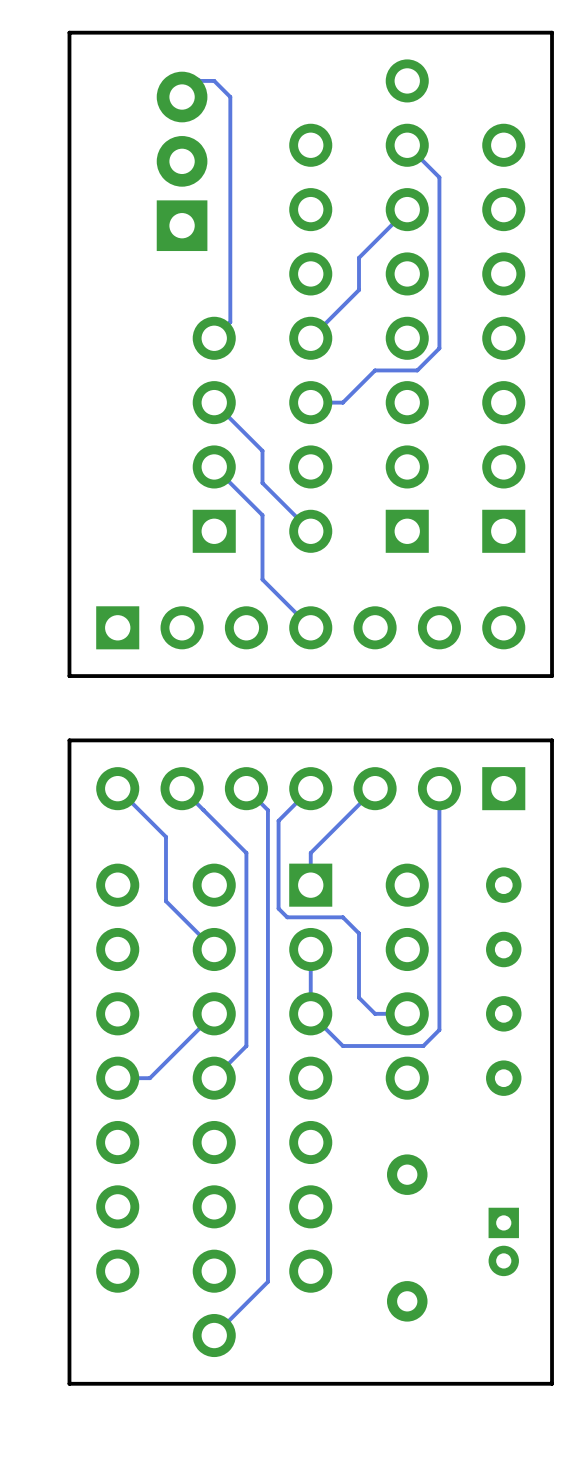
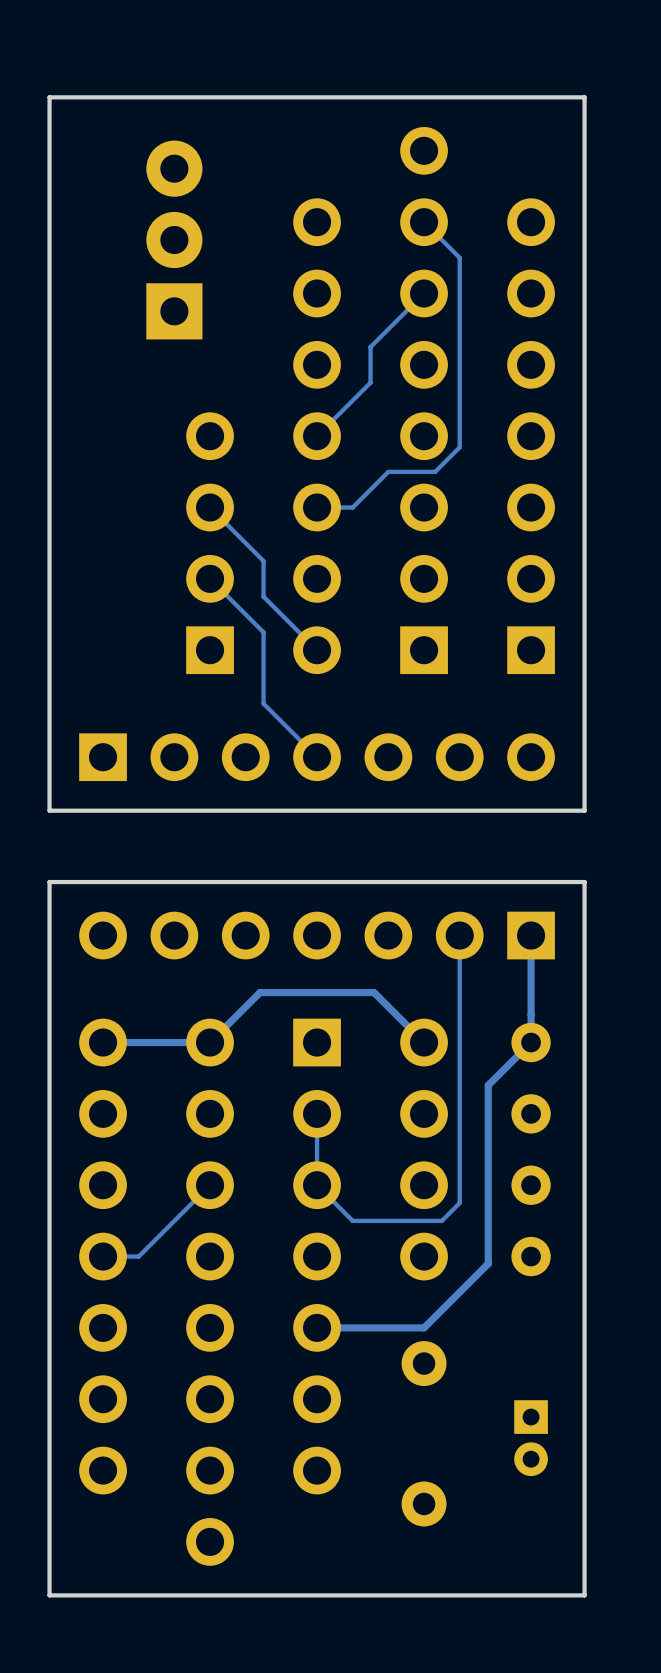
track: (198, 80) (182, 80) (214, 80) (230, 97) (230, 322) (214, 338) -> none
track: (117, 788) (165, 836) (165, 901) (214, 949) -> none
track: (182, 788) (246, 852) (246, 1046) (214, 1078) -> none
track: (246, 788) (267, 810) (267, 1281) (214, 1335) -> none
track: (310, 788) (278, 820) (278, 908) (287, 917) (342, 917) (359, 933) (359, 997) (375, 1013) (407, 1013) -> none
track: (375, 788) (310, 852) (310, 885) -> none
track: none -> (531, 935) (531, 1042) (488, 1085) (488, 1263) (424, 1327) (317, 1327)
track: none -> (424, 1042) (374, 992) (259, 992) (210, 1042) (103, 1042)

